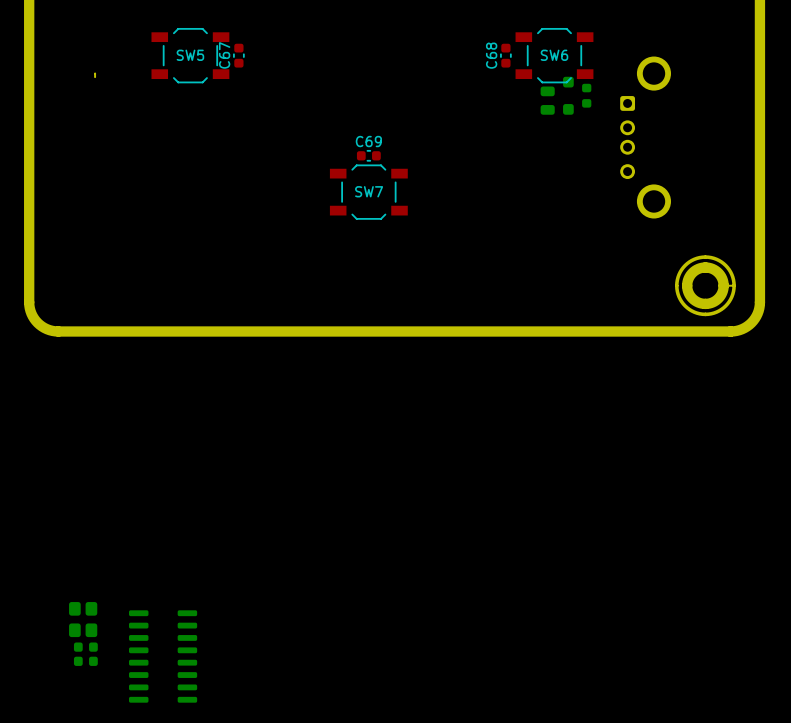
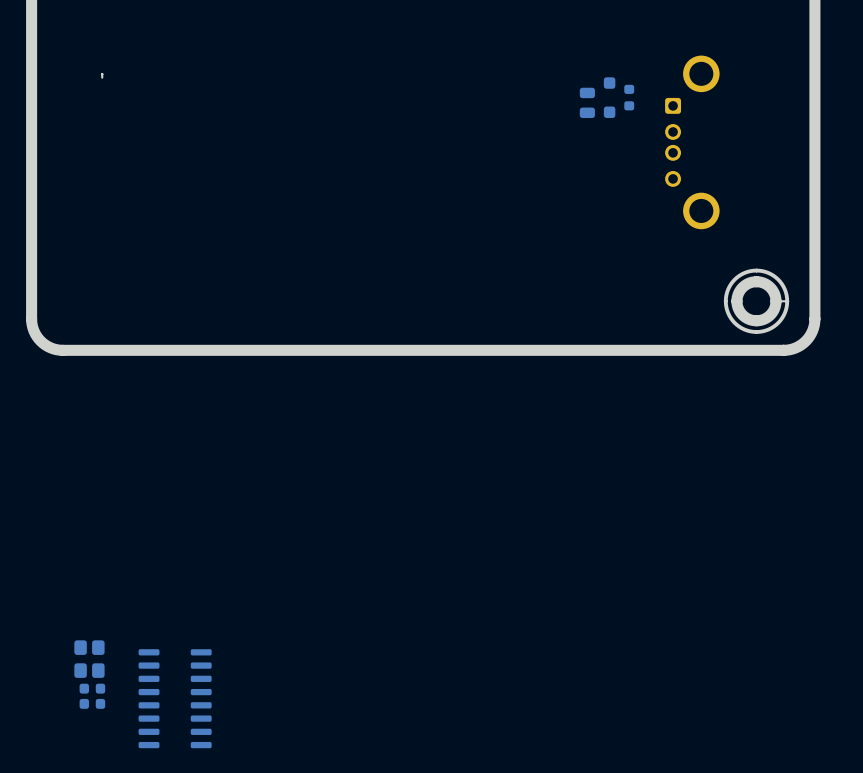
SW5: (190, 55) -> none
C67: (238, 55) -> none
C68: (505, 55) -> none
SW6: (554, 55) -> none
C69: (368, 155) -> none
SW7: (368, 192) -> none

